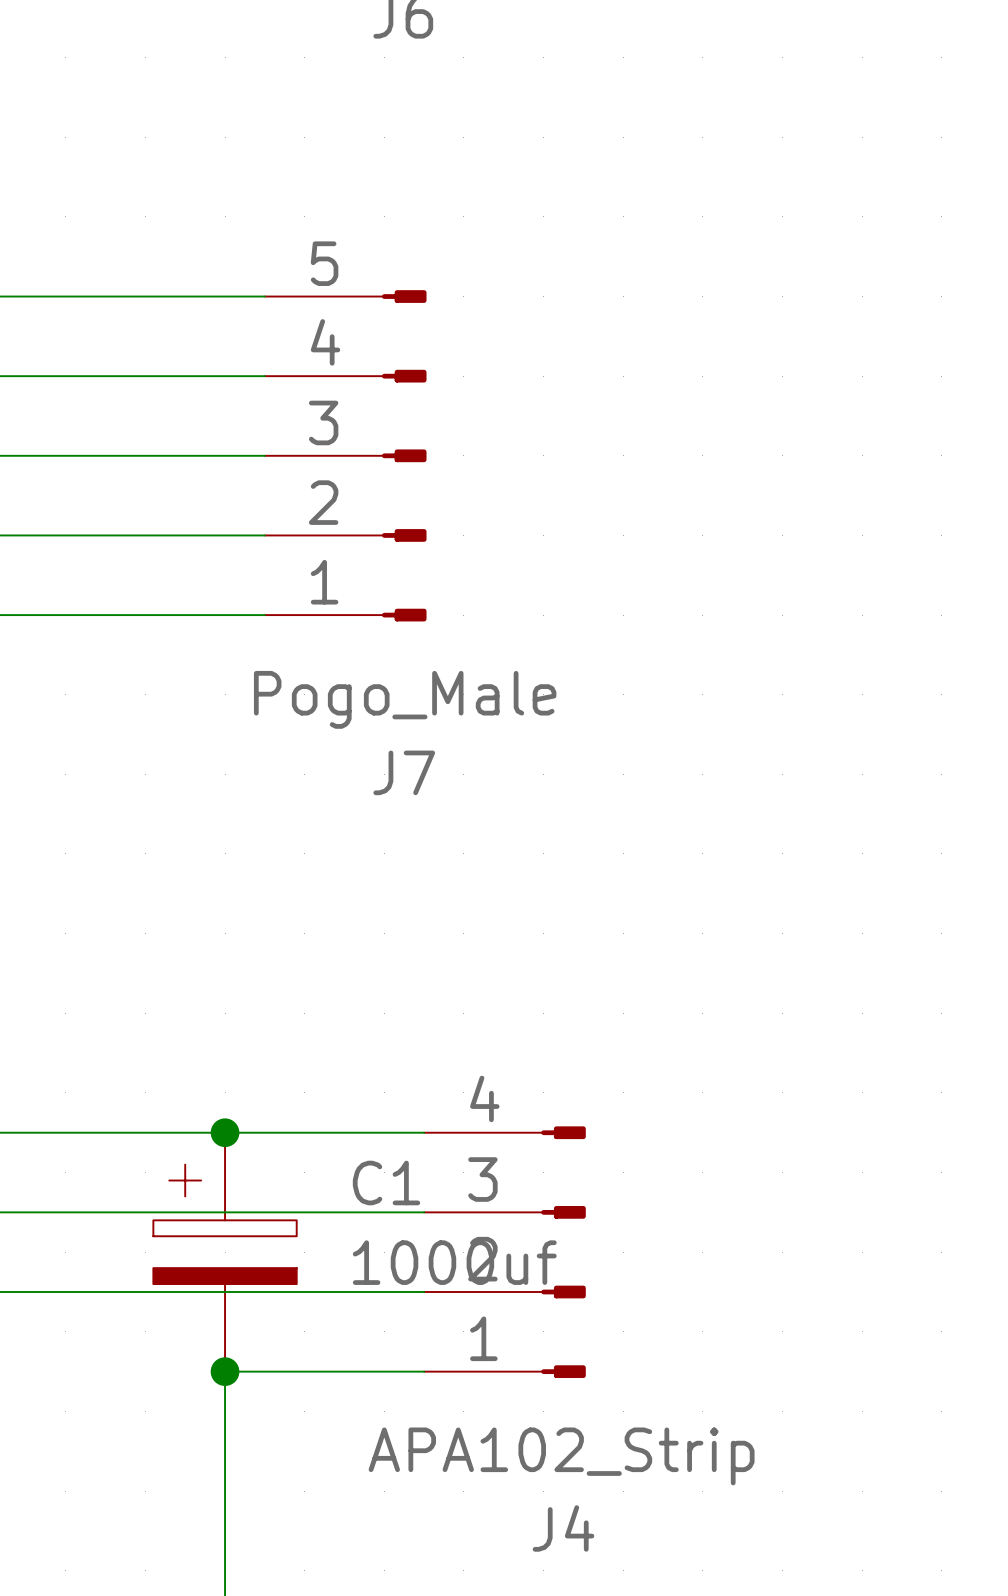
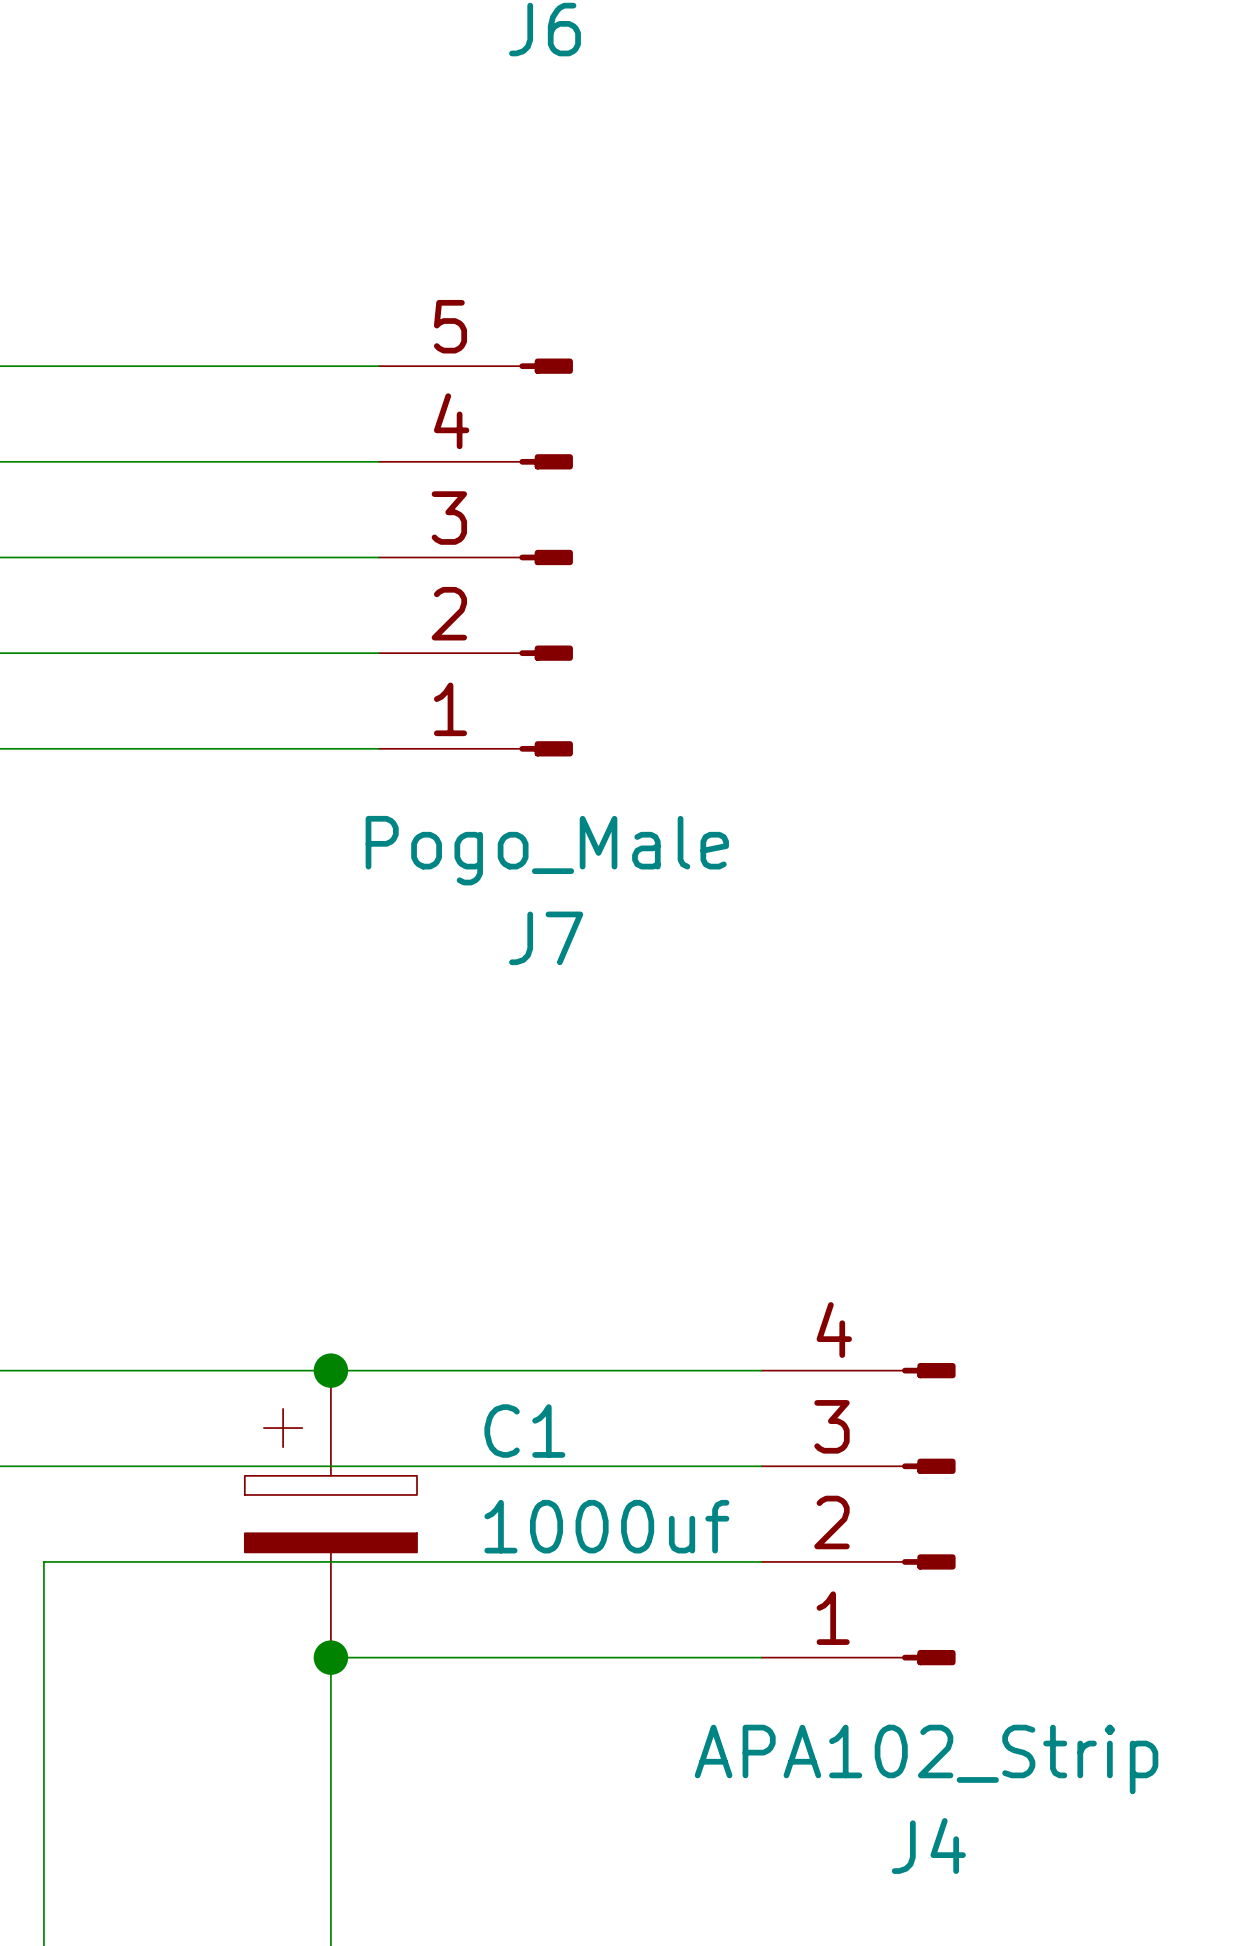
J4 position: (504, 1252) -> (858, 1514)

